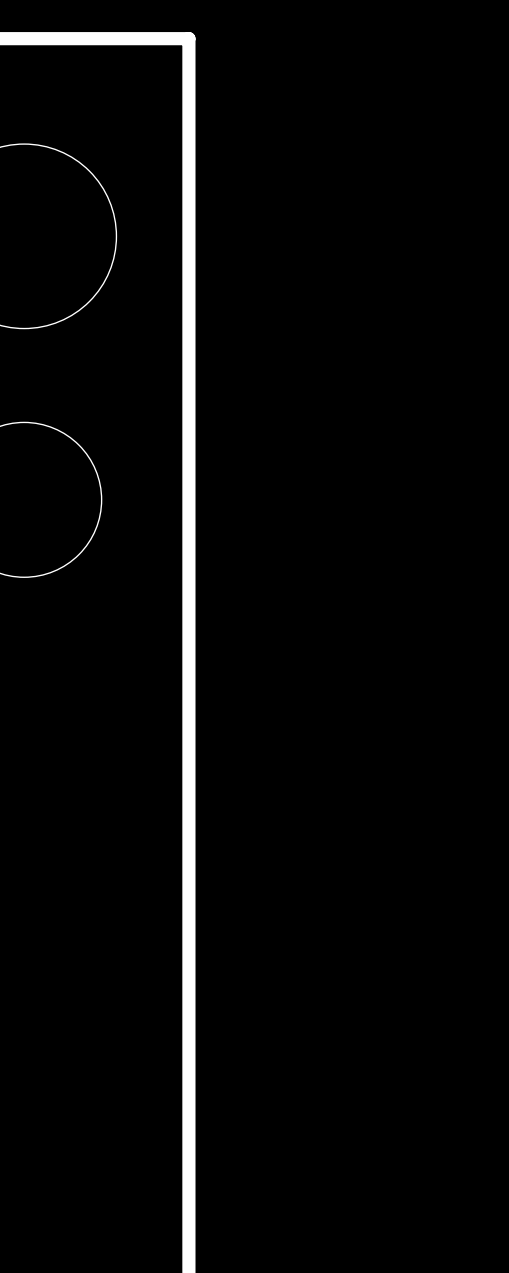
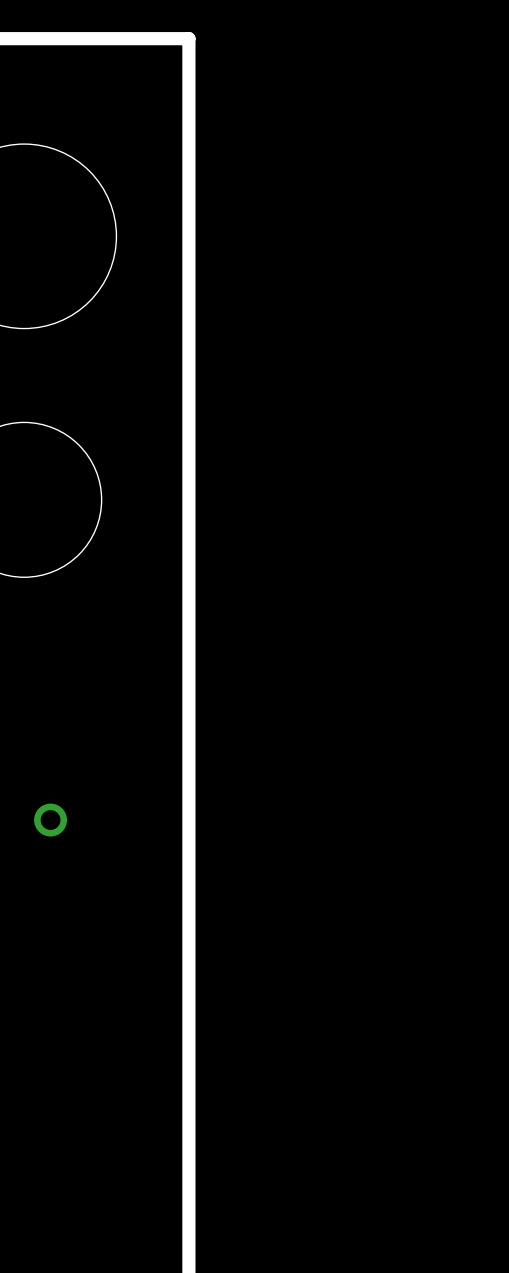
via: none -> (50, 820)

